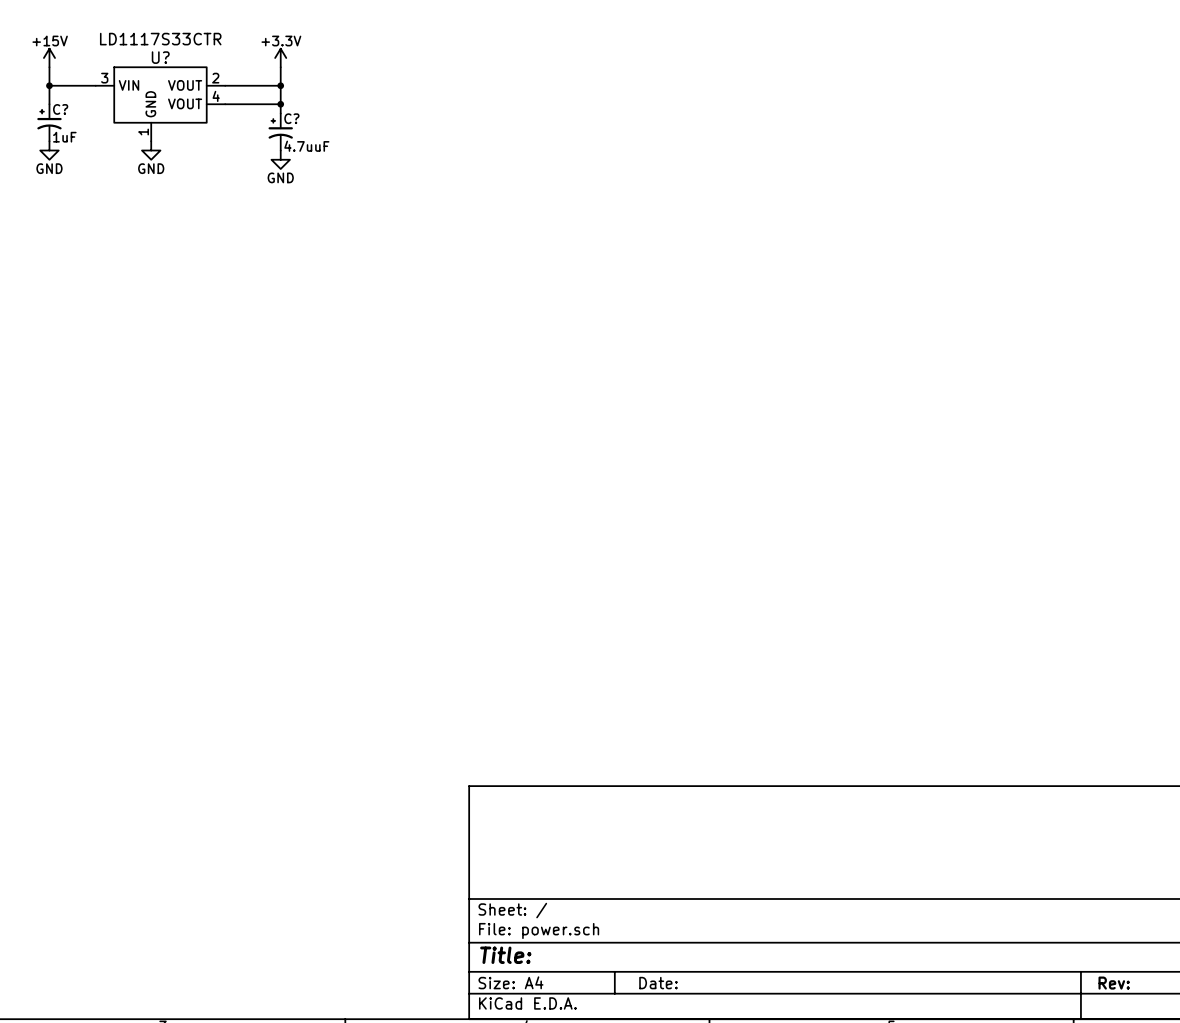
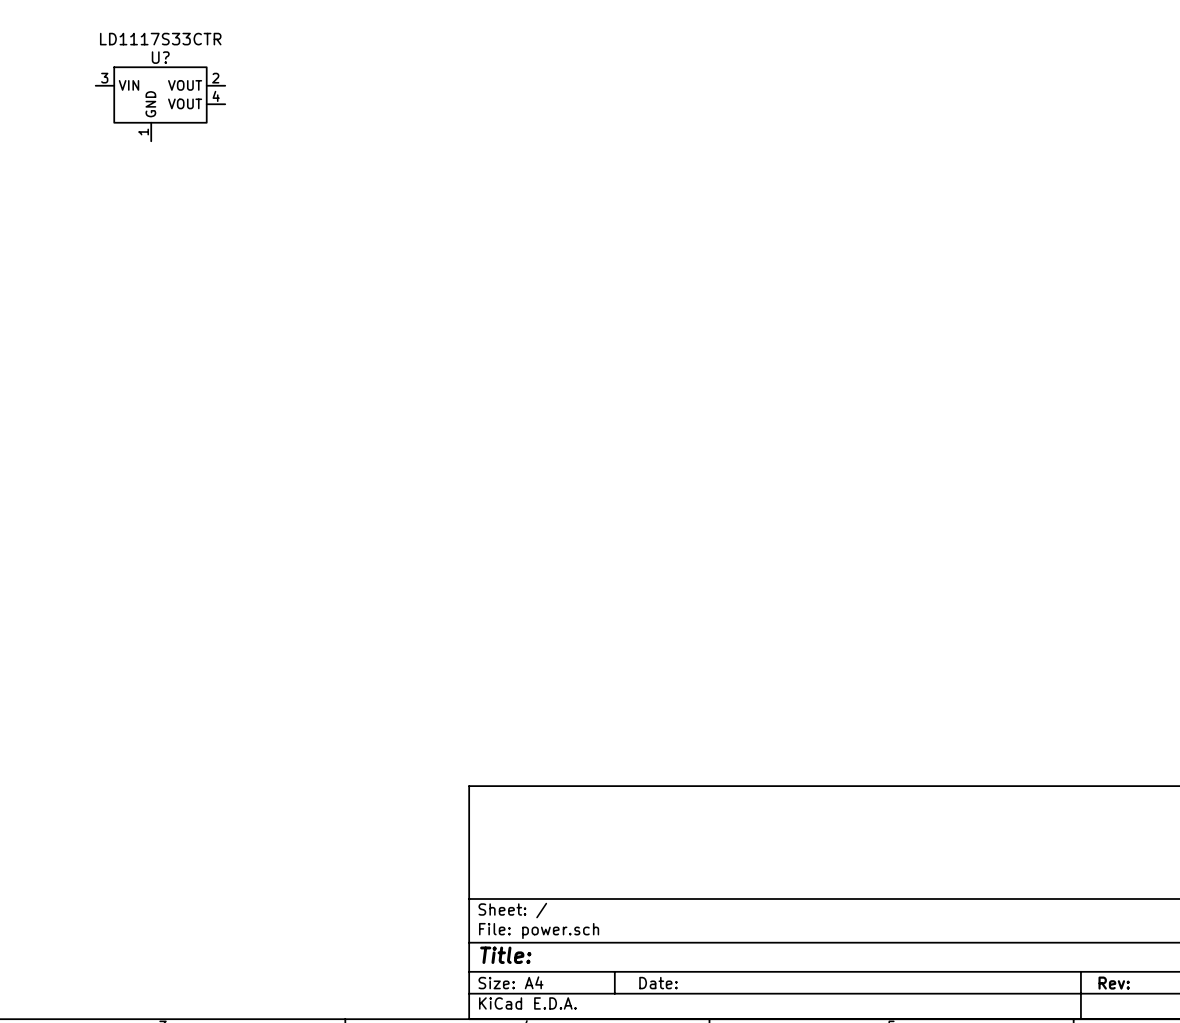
power symbol: +15V (49, 58) -> none
power symbol: +3.3V (280, 58) -> none
wire: (49, 67) (49, 104) -> none
wire: (280, 67) (280, 113) -> none
wire: (49, 85) (95, 85) -> none
junction: (49, 85) -> none
wire: (225, 85) (280, 85) -> none
junction: (280, 85) -> none
wire: (225, 104) (280, 104) -> none
junction: (280, 104) -> none
C?: 1uF (49, 122) -> none
C?: 4.7uuF (280, 132) -> none
power symbol: GND (49, 150) -> none
power symbol: GND (151, 150) -> none
power symbol: GND (280, 159) -> none

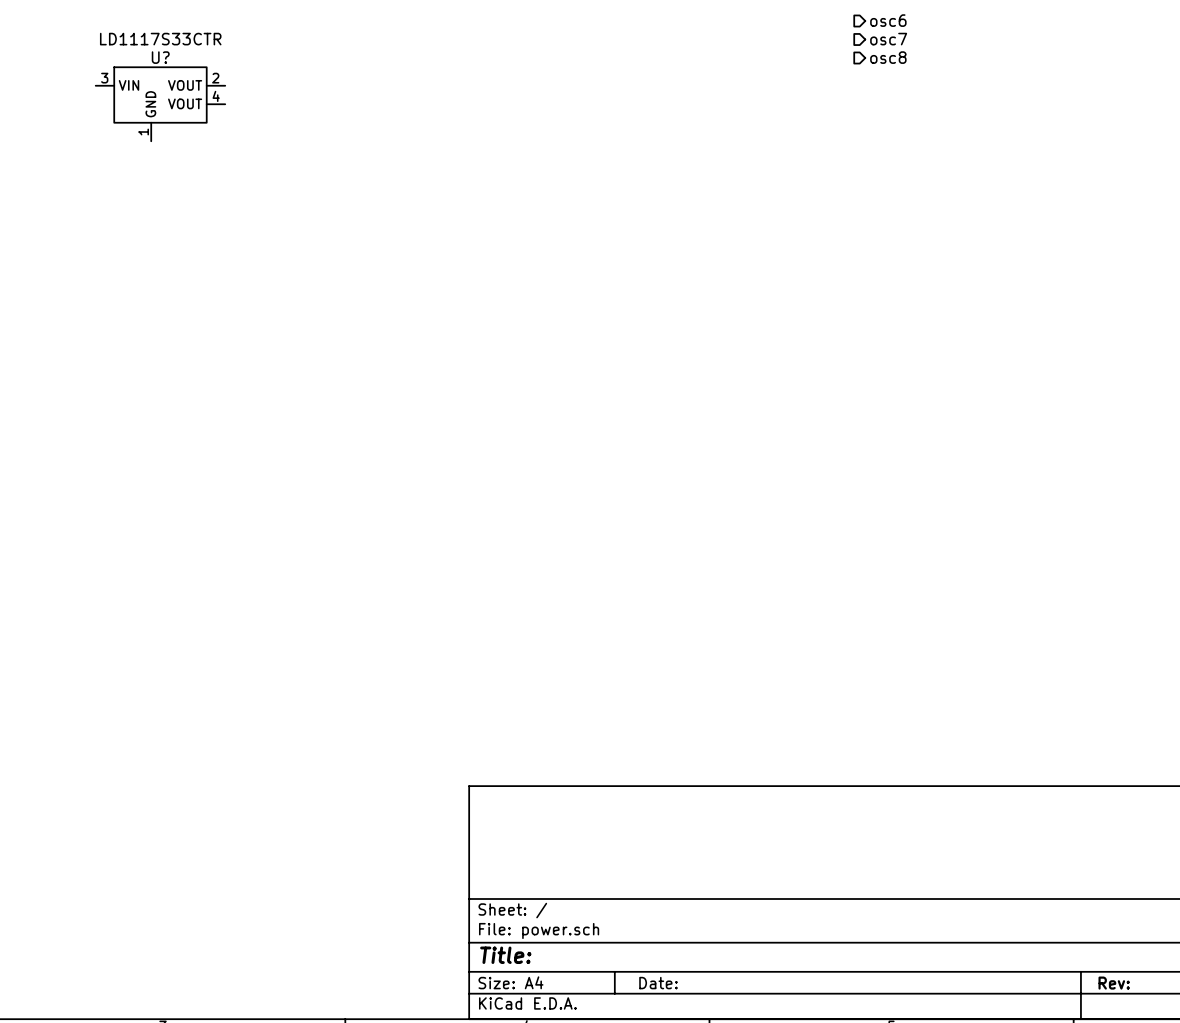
hierarchical label: none -> osc6 (888, 20)
hierarchical label: none -> osc7 (888, 39)
hierarchical label: none -> osc8 (888, 57)

